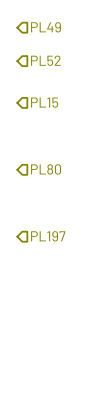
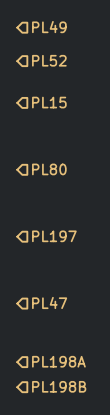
hierarchical label: none -> PL47 (49, 302)
hierarchical label: none -> PL198A (58, 361)
hierarchical label: none -> PL198B (59, 386)

